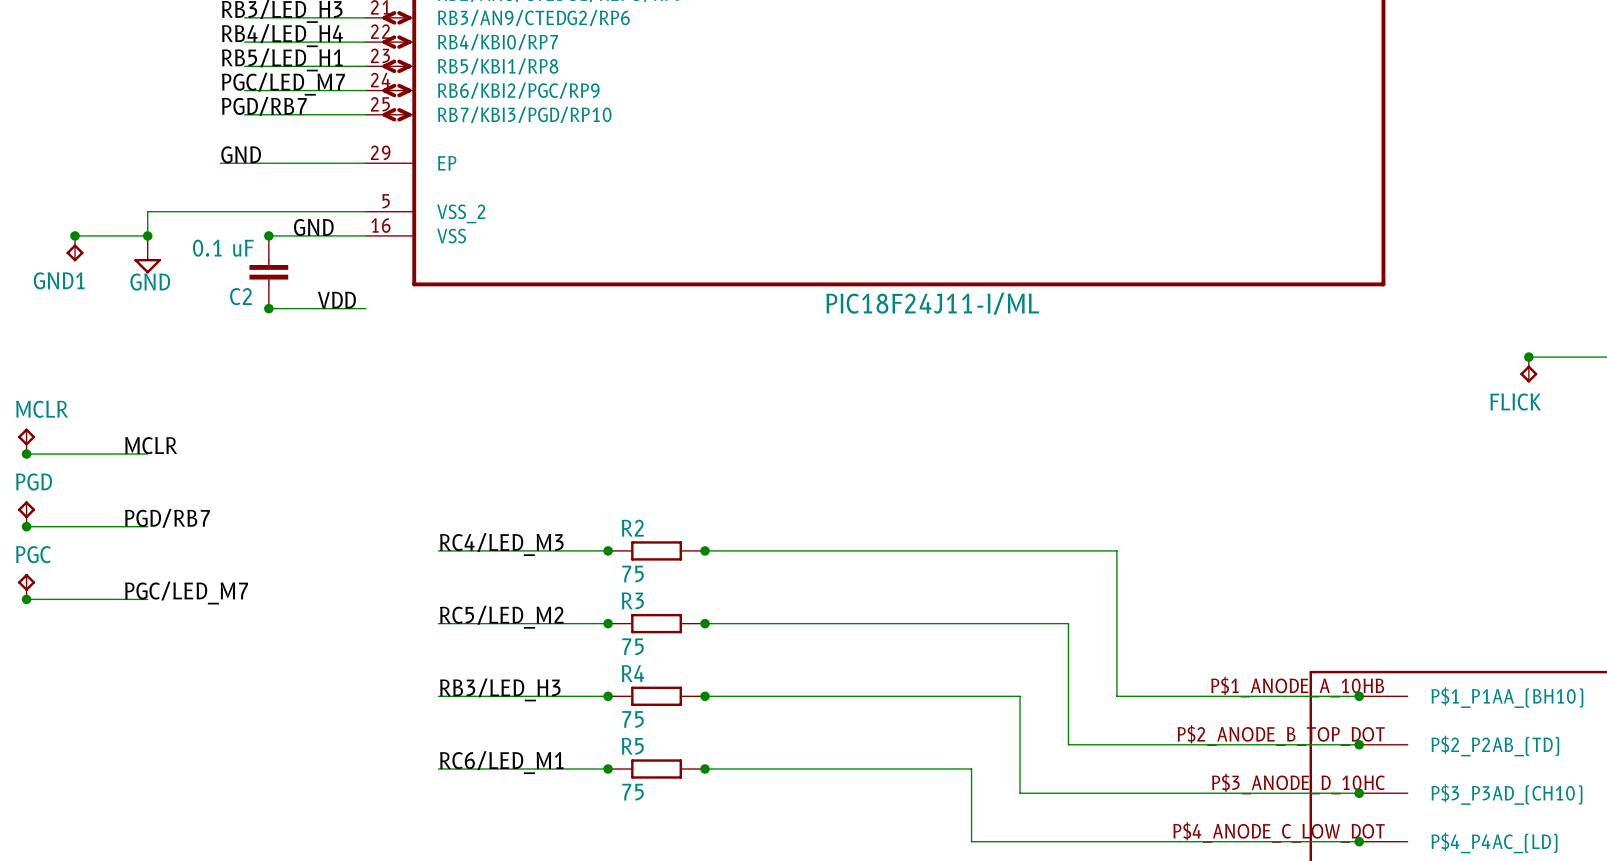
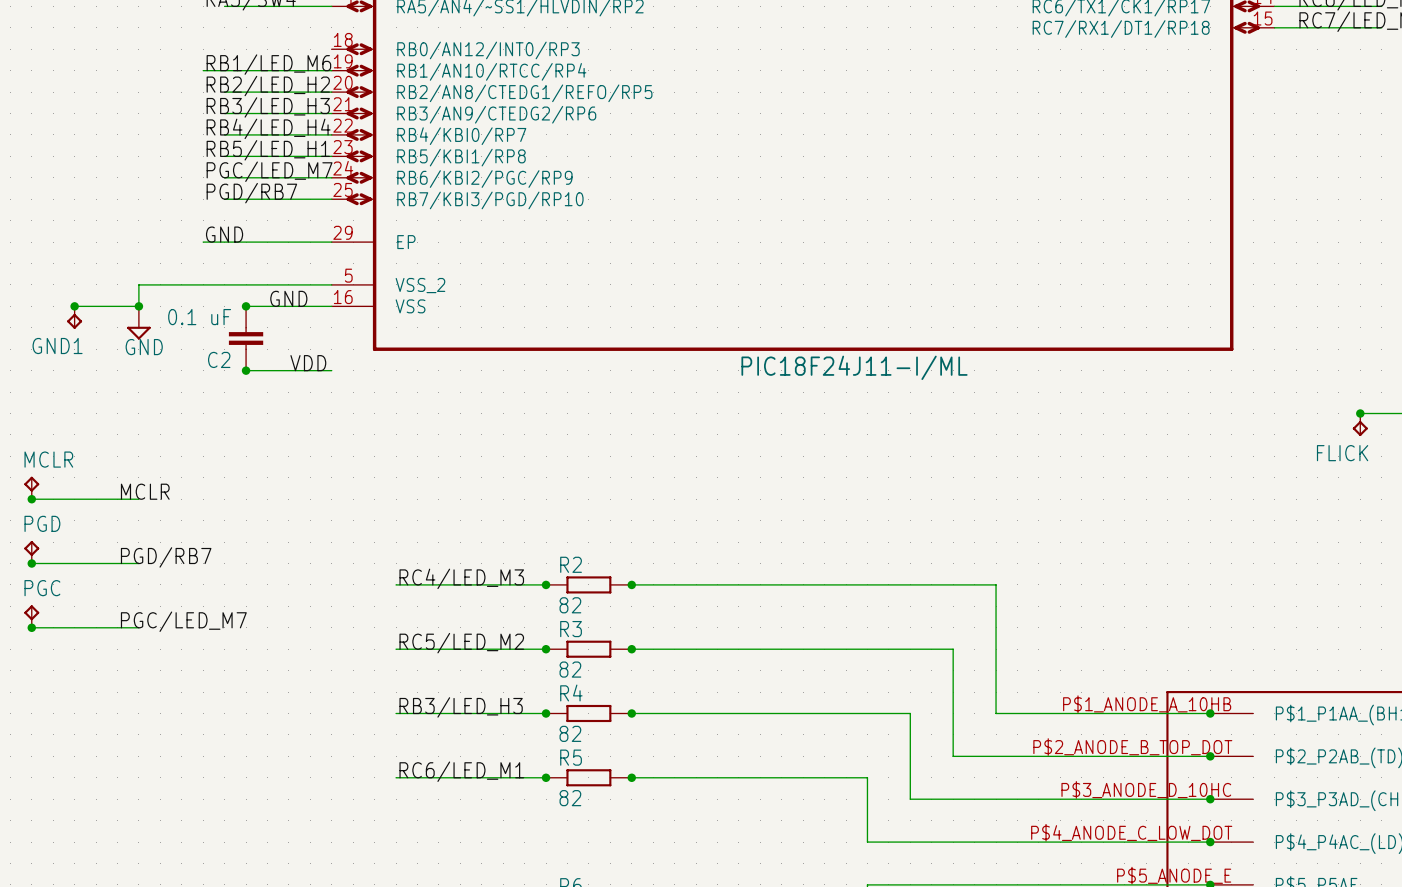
R2 value: 75 (633, 574) -> 82 (570, 605)
R3 value: 75 (633, 646) -> 82 (570, 669)
R4 value: 75 (633, 719) -> 82 (570, 733)
R5 value: 75 (633, 792) -> 82 (570, 798)

